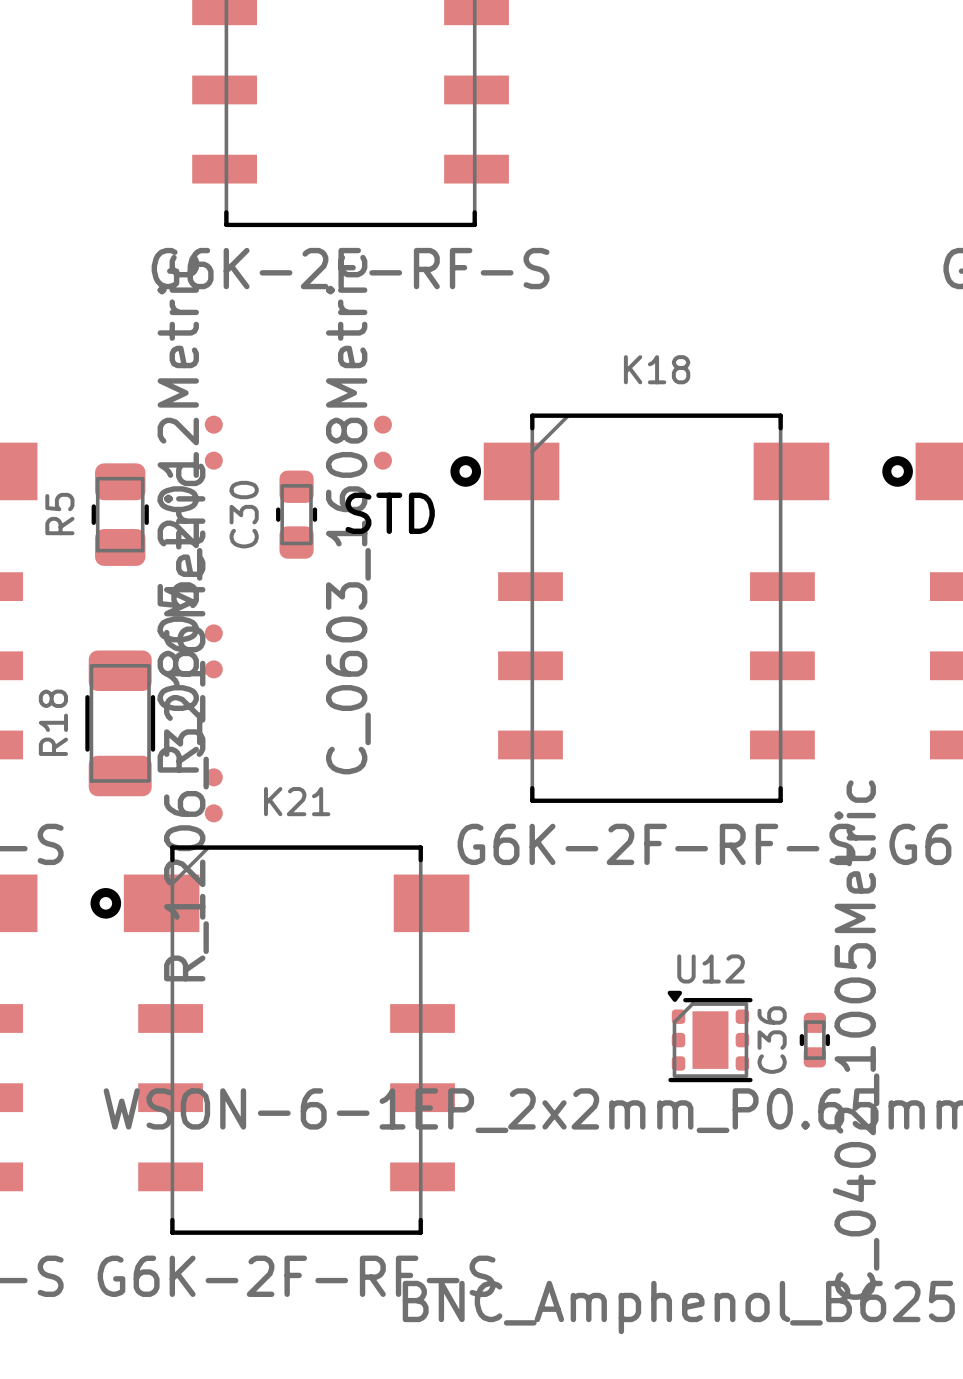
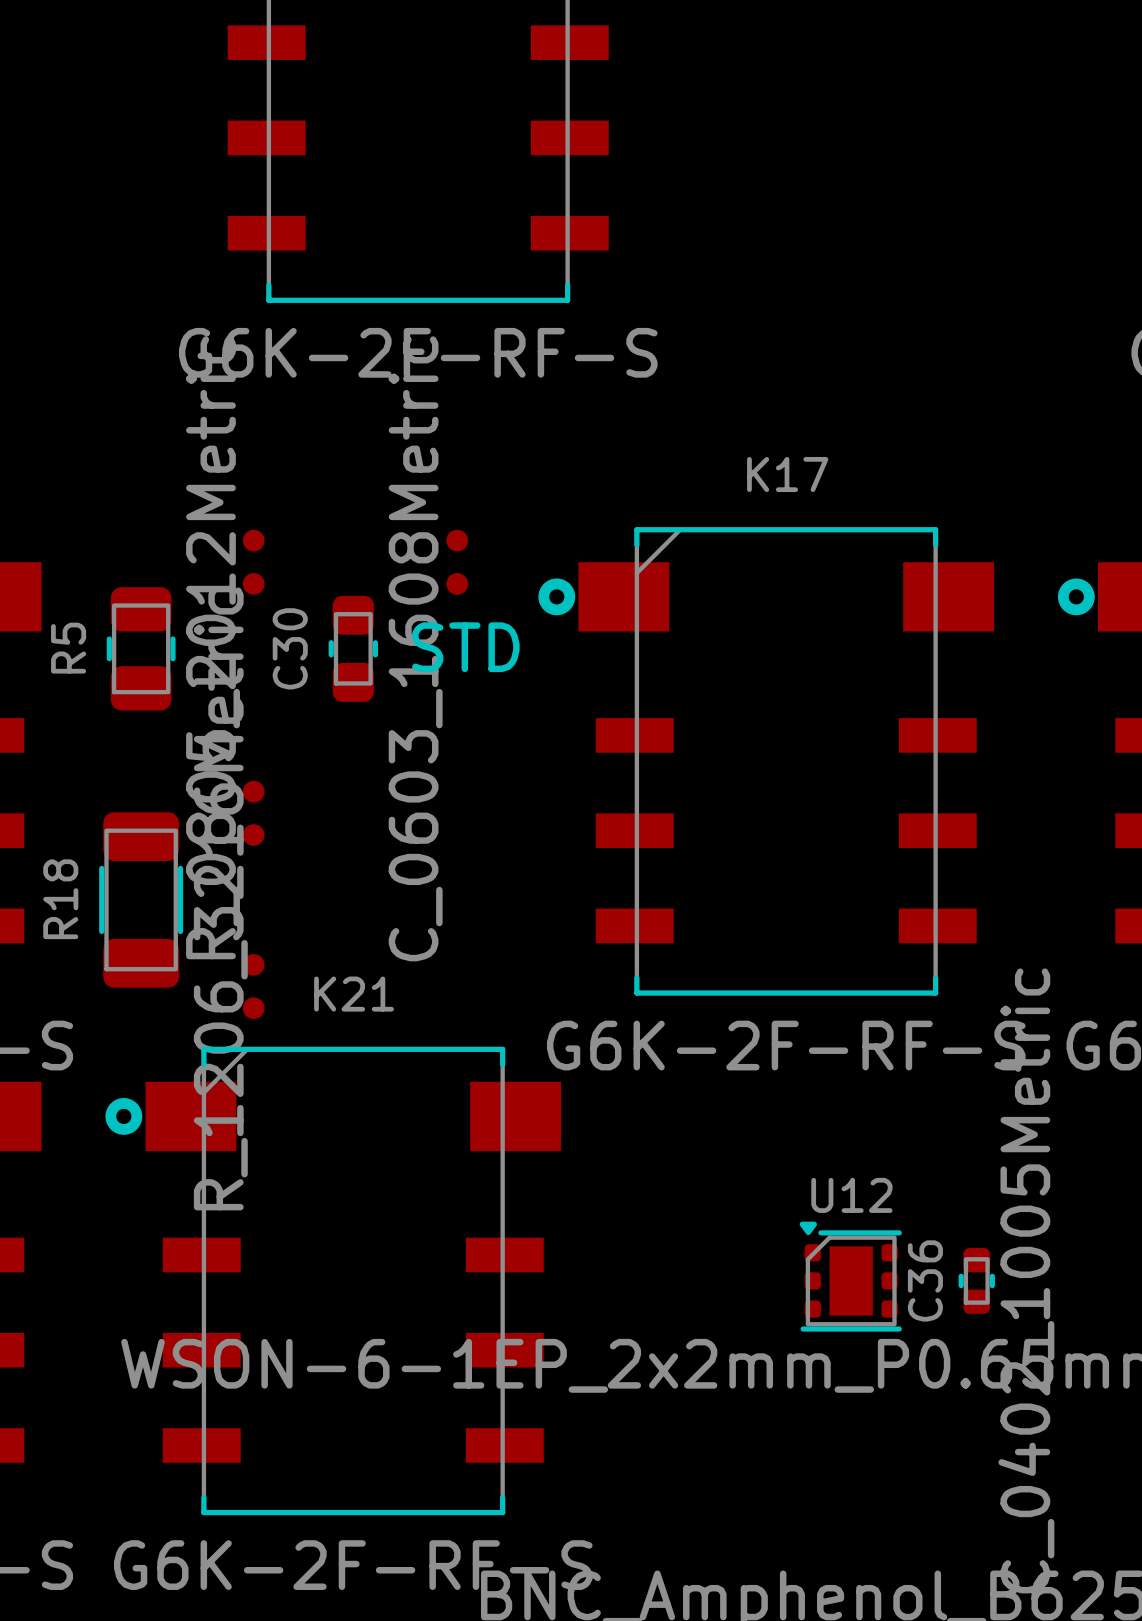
K18 name: K18 (657, 369) -> K17 (787, 474)

